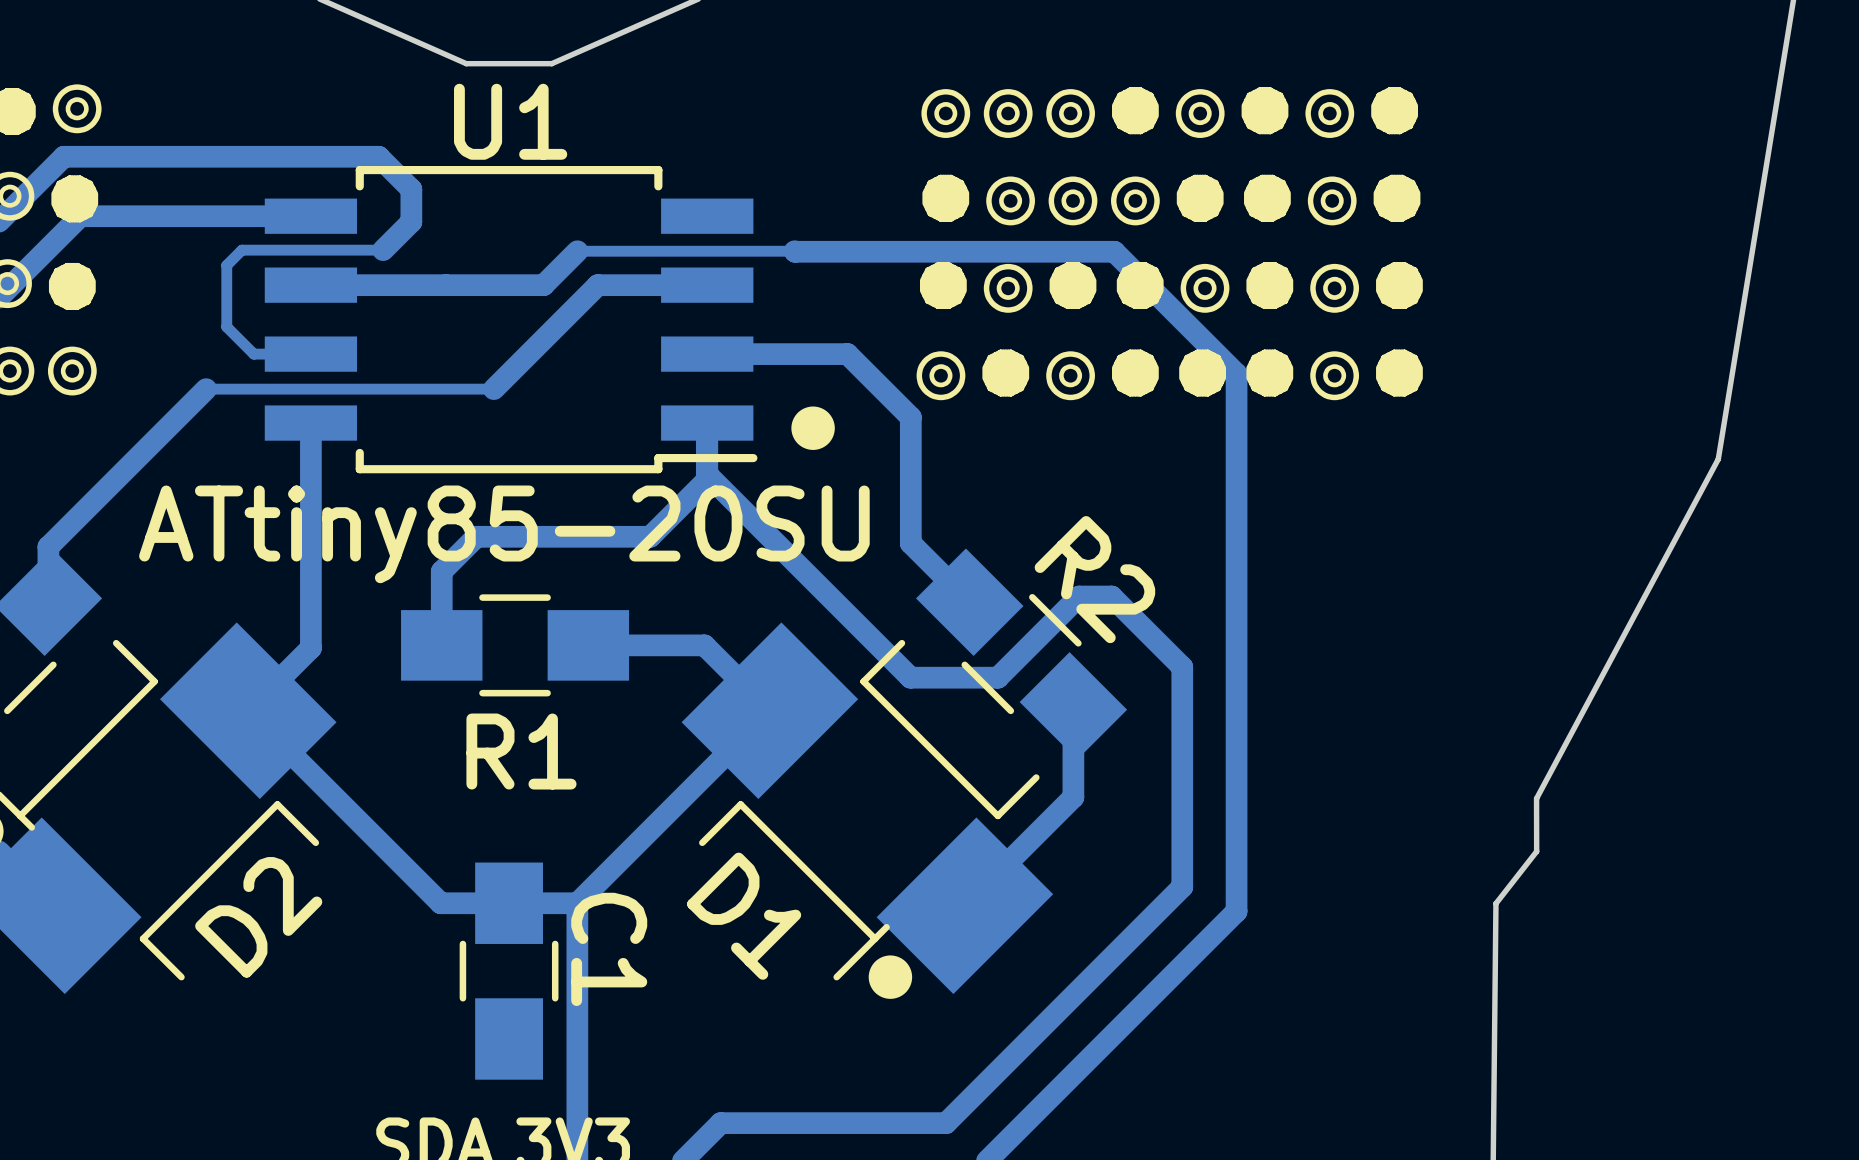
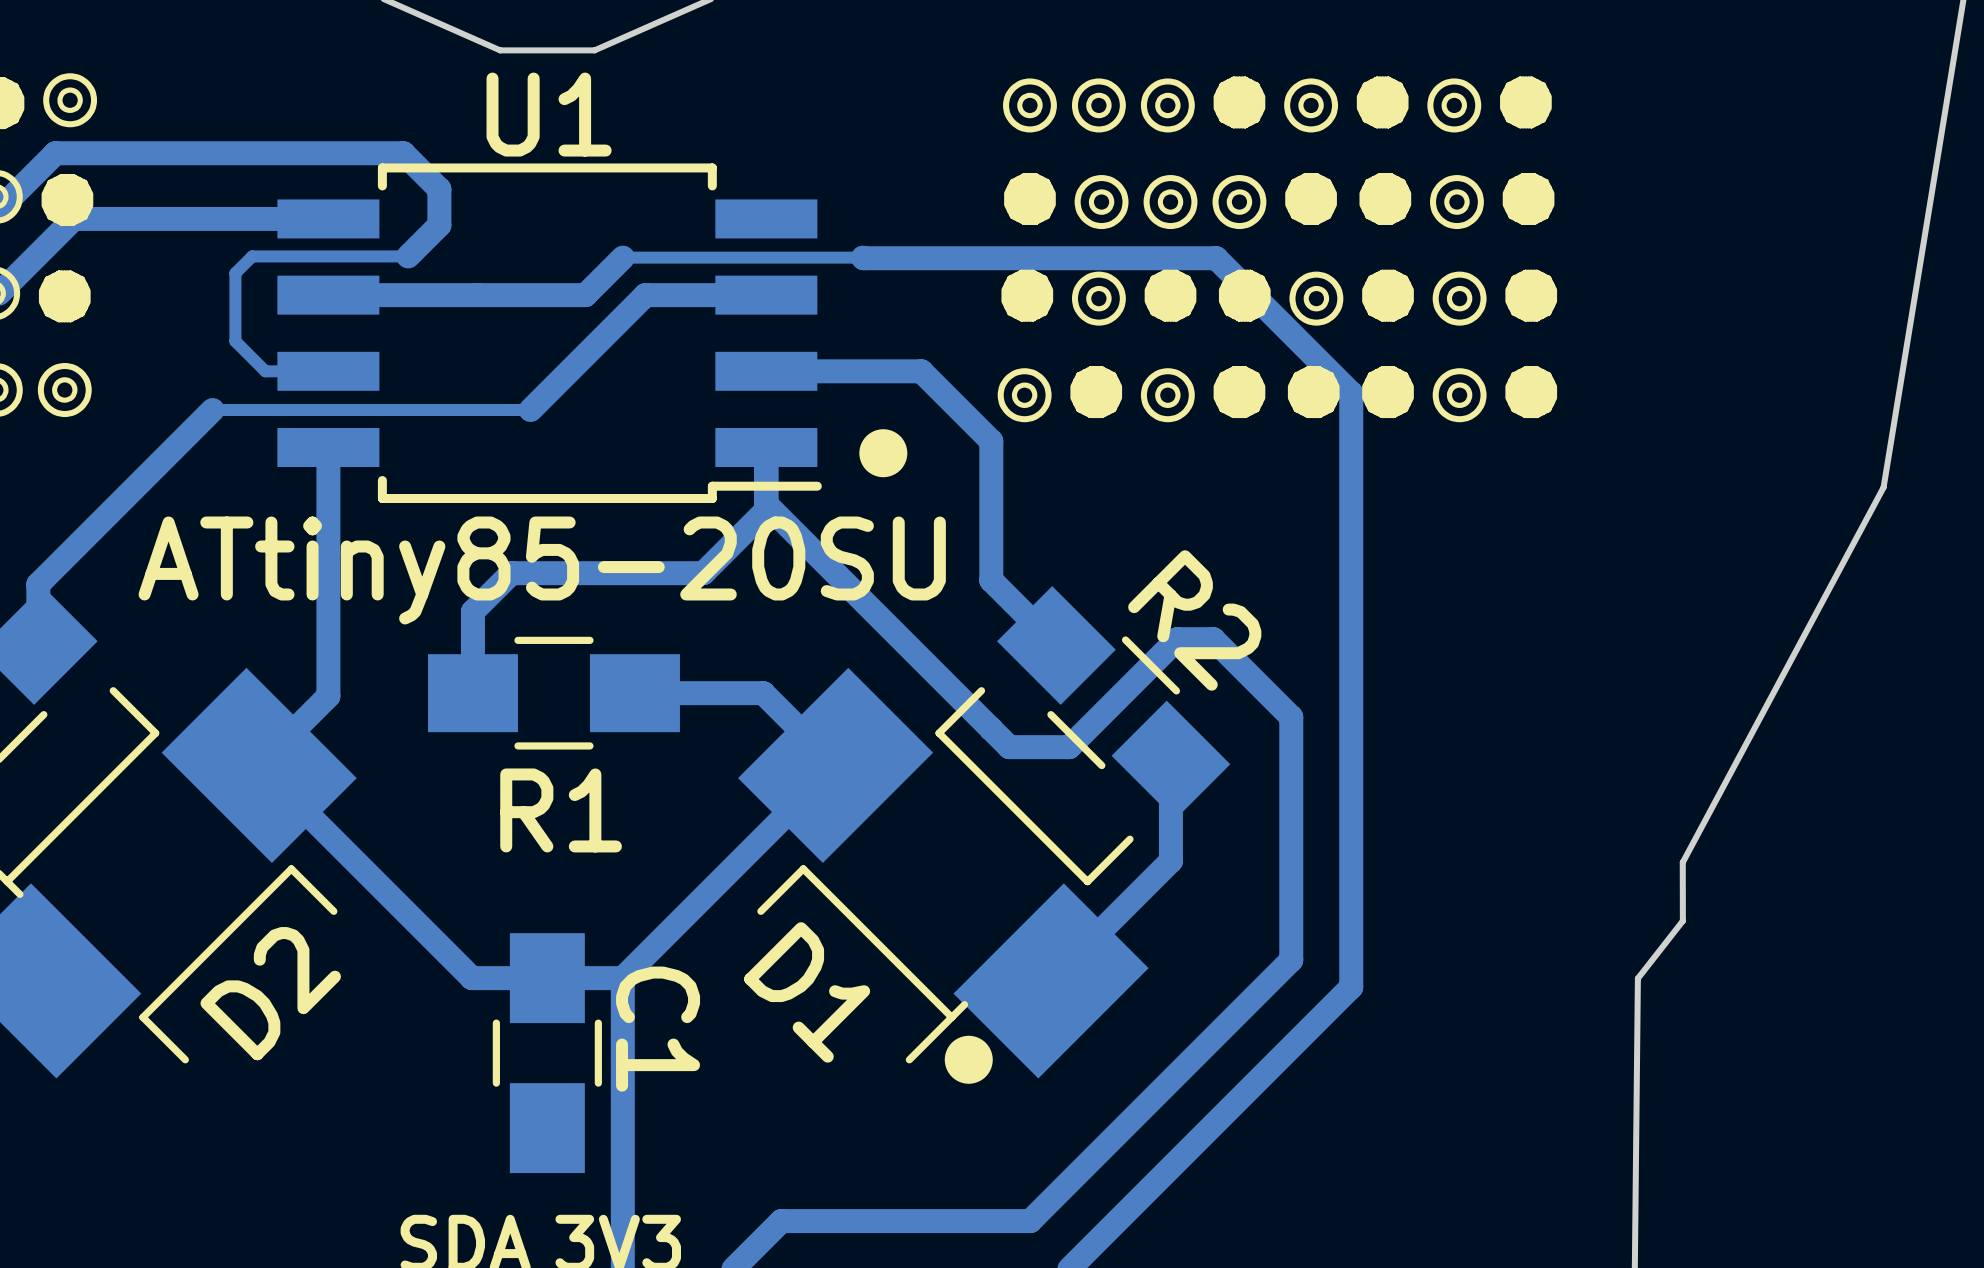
track: (997, 677) (910, 677) -> (1087, 728) (1069, 747) (1009, 747) (991, 728)

